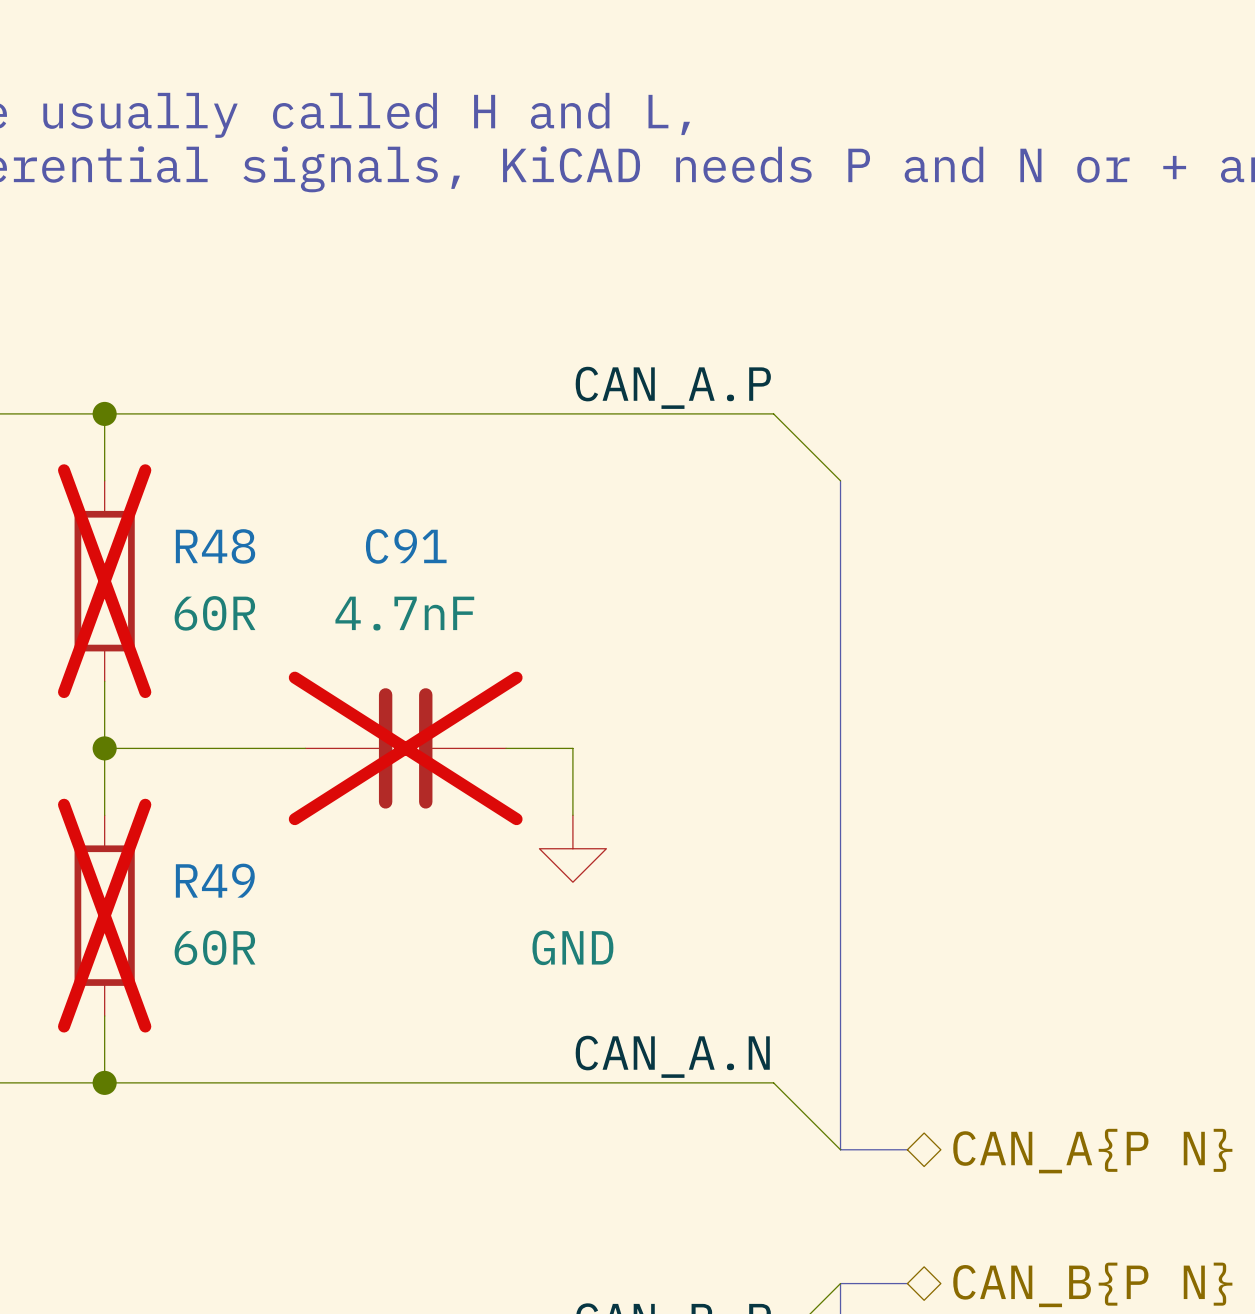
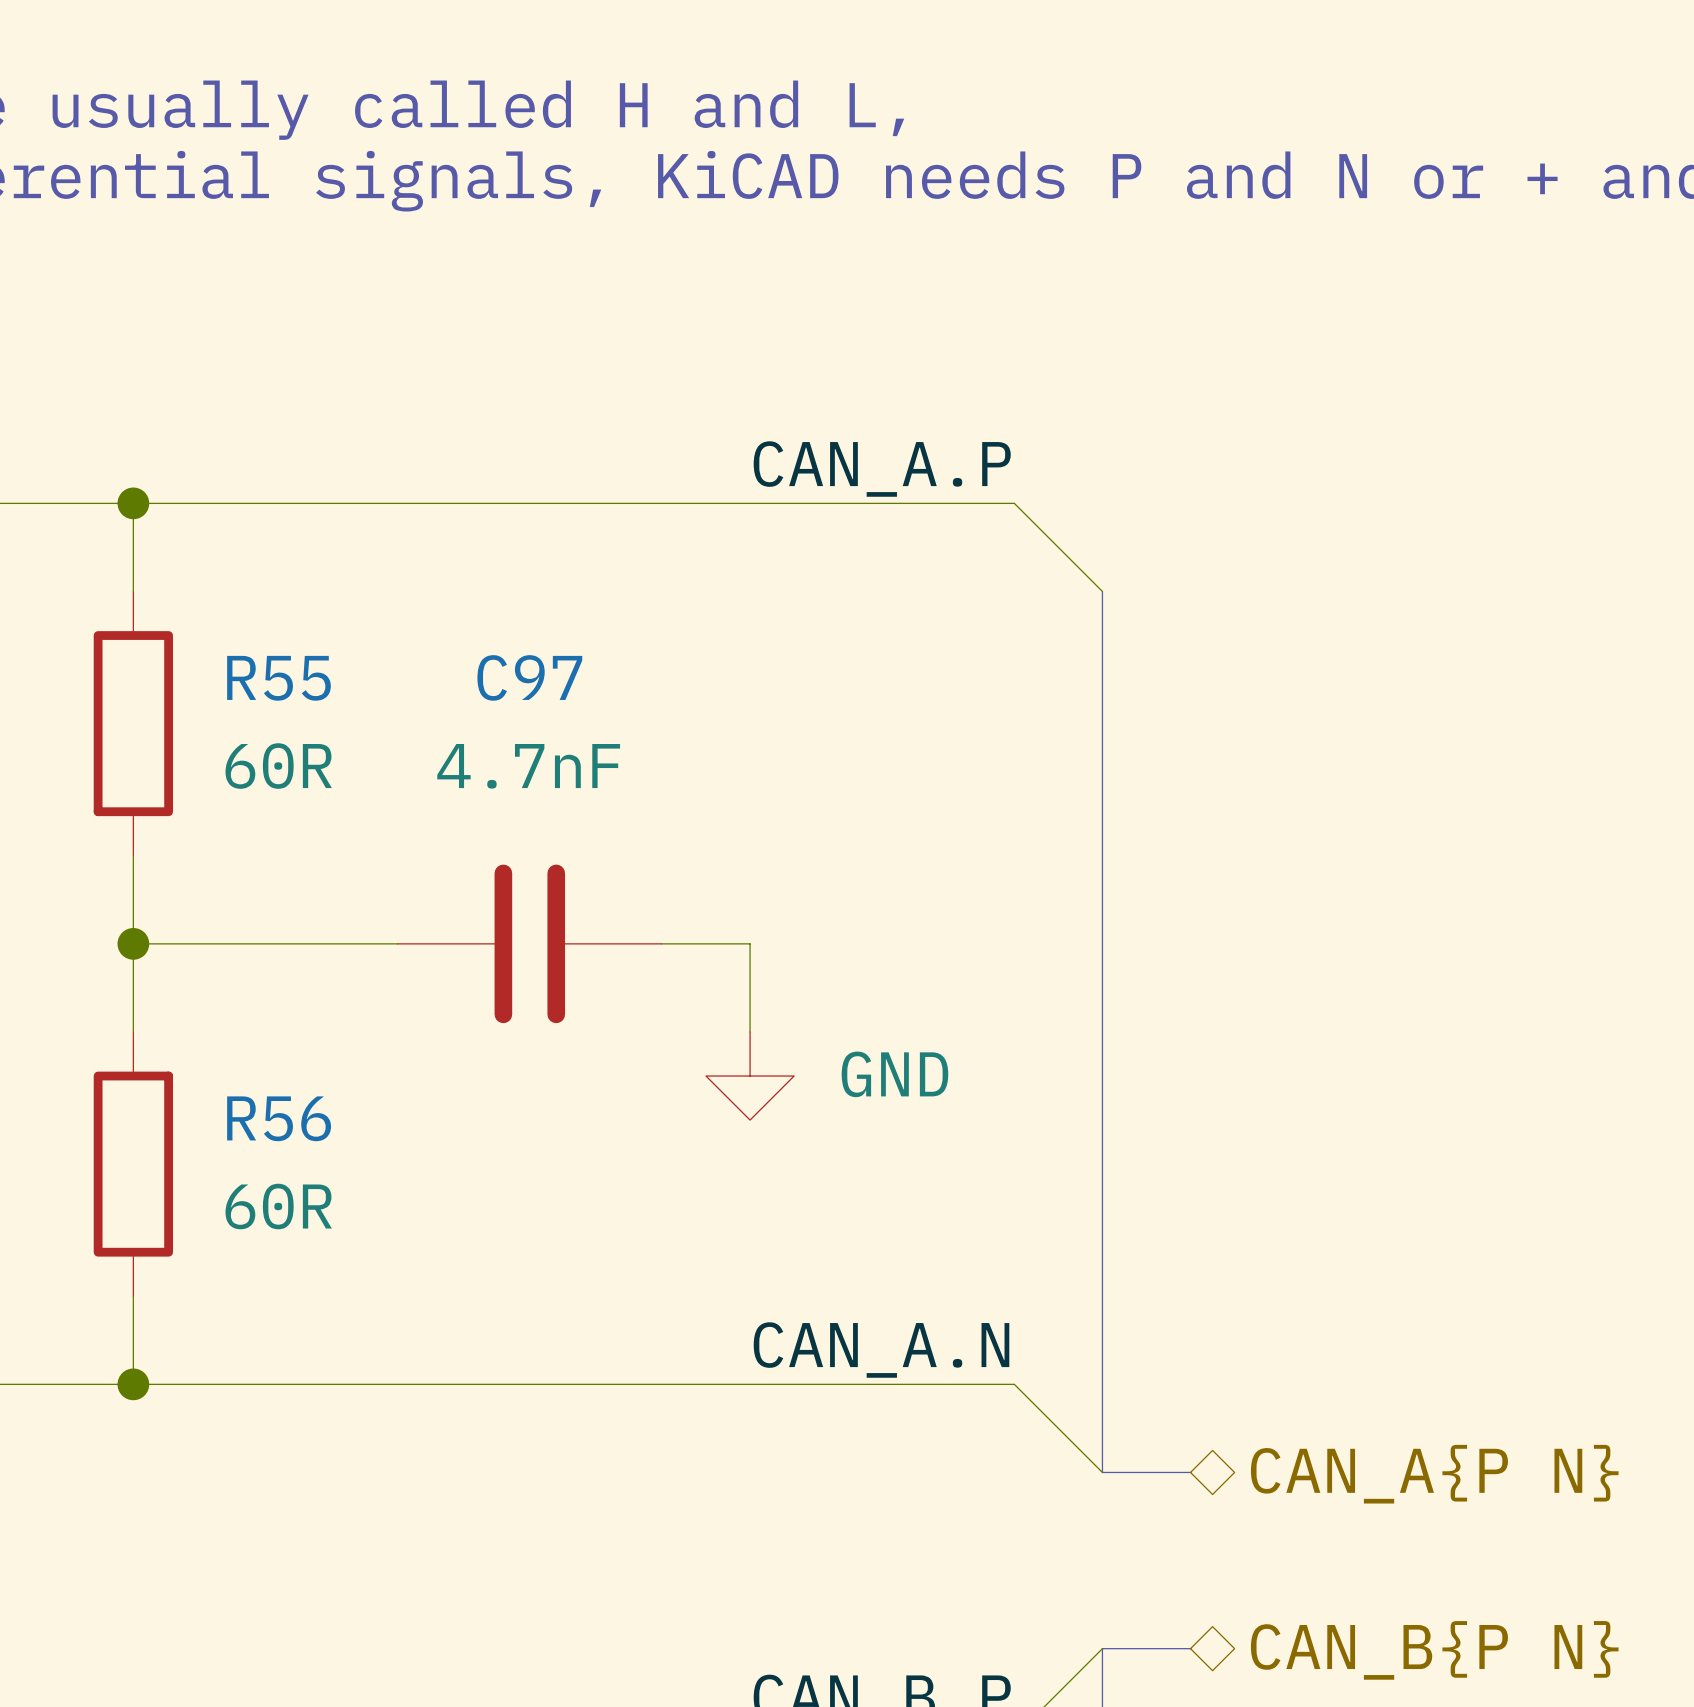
R48 name: R48 (215, 546) -> R55 (278, 678)
C91 name: C91 (406, 546) -> C97 (529, 677)
R48 do-not-place cross: (104, 581) -> none
C91 do-not-place cross: (405, 748) -> none
R49 name: R49 (215, 880) -> R56 (279, 1118)
R49 do-not-place cross: (104, 915) -> none
power symbol text position: GND (572, 947) -> GND (894, 1074)

